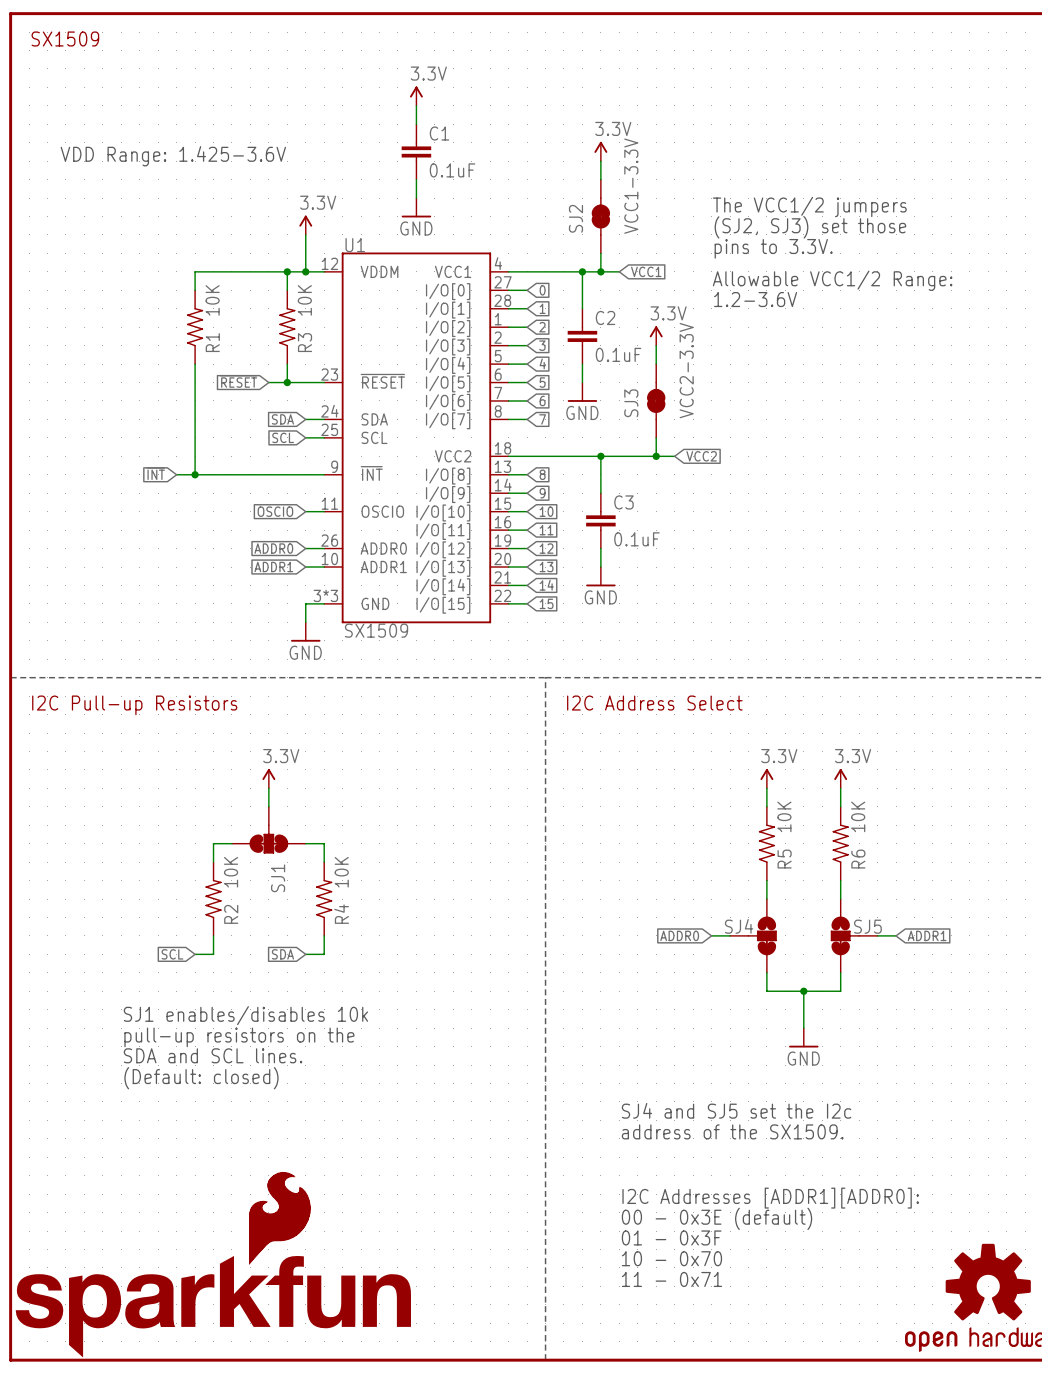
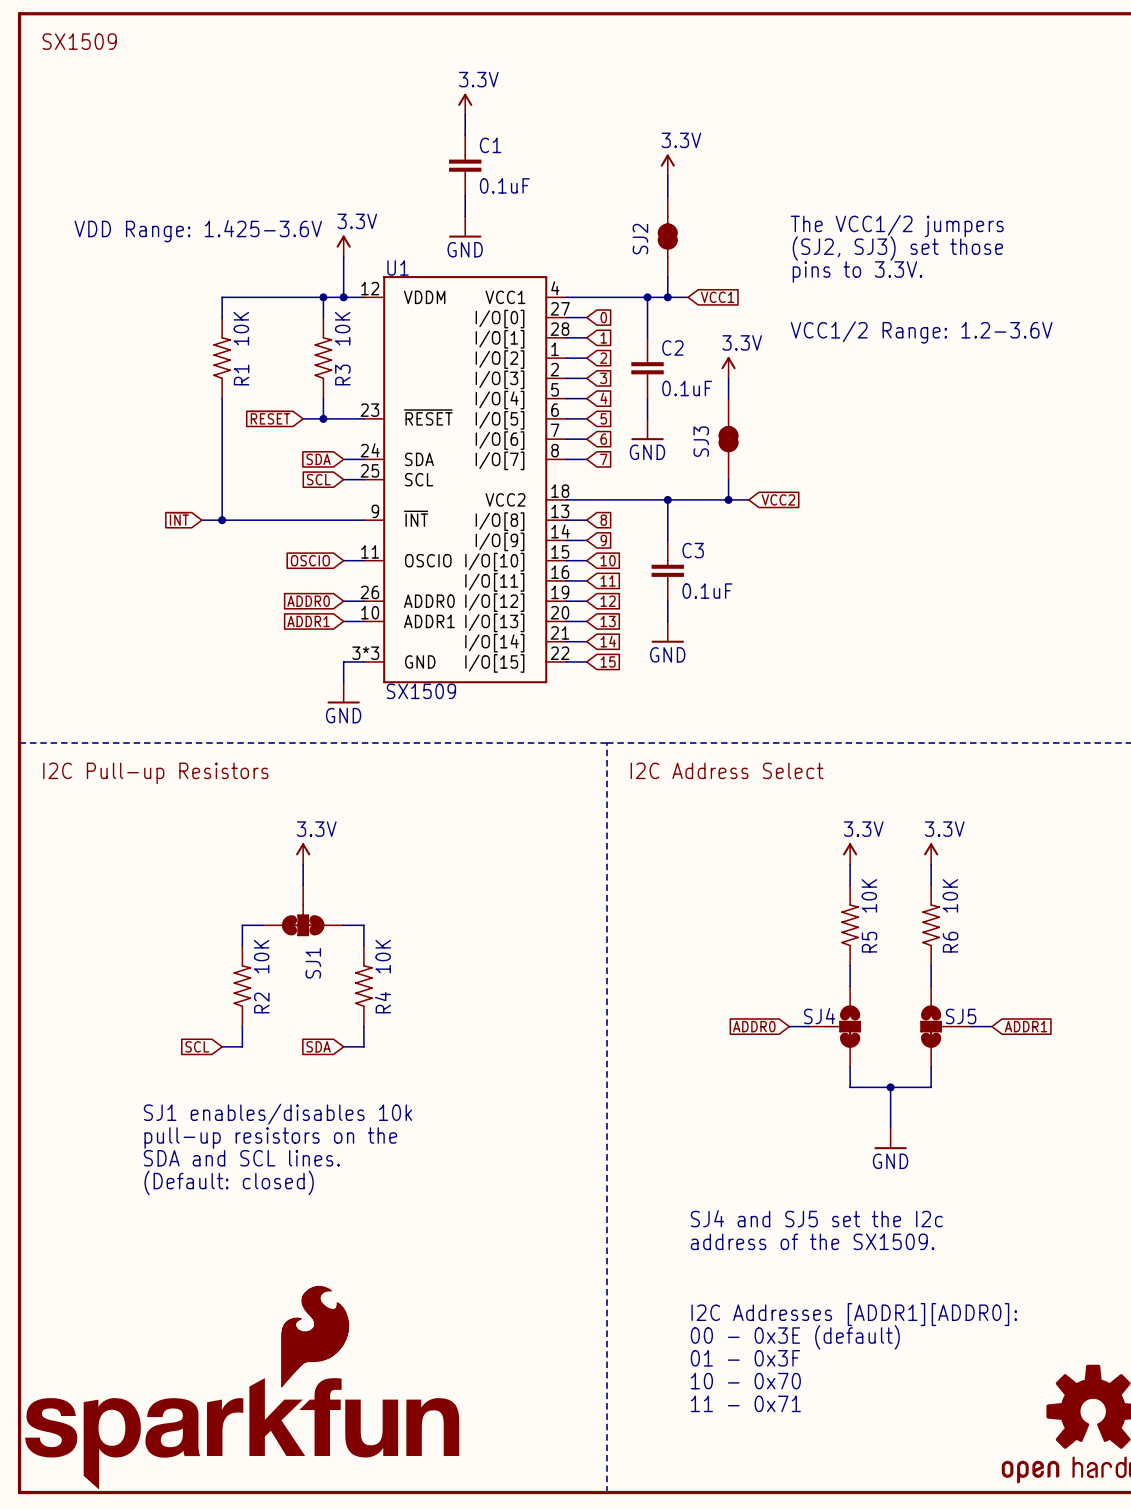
text position: VDD Range: 1.425-3.6V (173, 156) -> VDD Range: 1.425-3.6V (198, 231)
SJ2 value: VCC1-3.3V (631, 186) -> none
text: Allowable VCC1/2 Range: (832, 280) -> none
text: 1.2-3.6V (755, 299) -> none
text: none -> VCC1/2 Range: 1.2-3.6V (921, 332)
SJ3 value: VCC2-3.3V (686, 370) -> none

